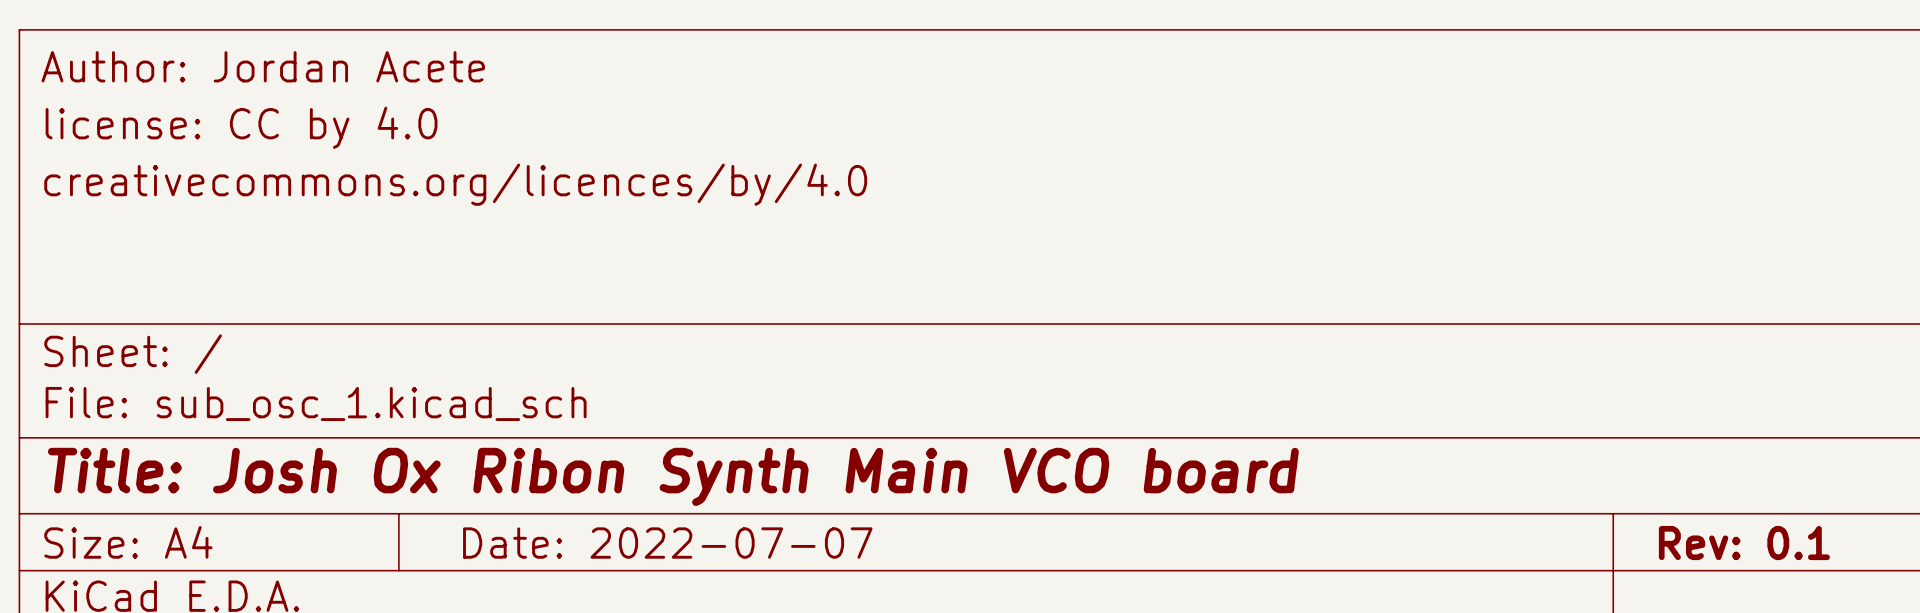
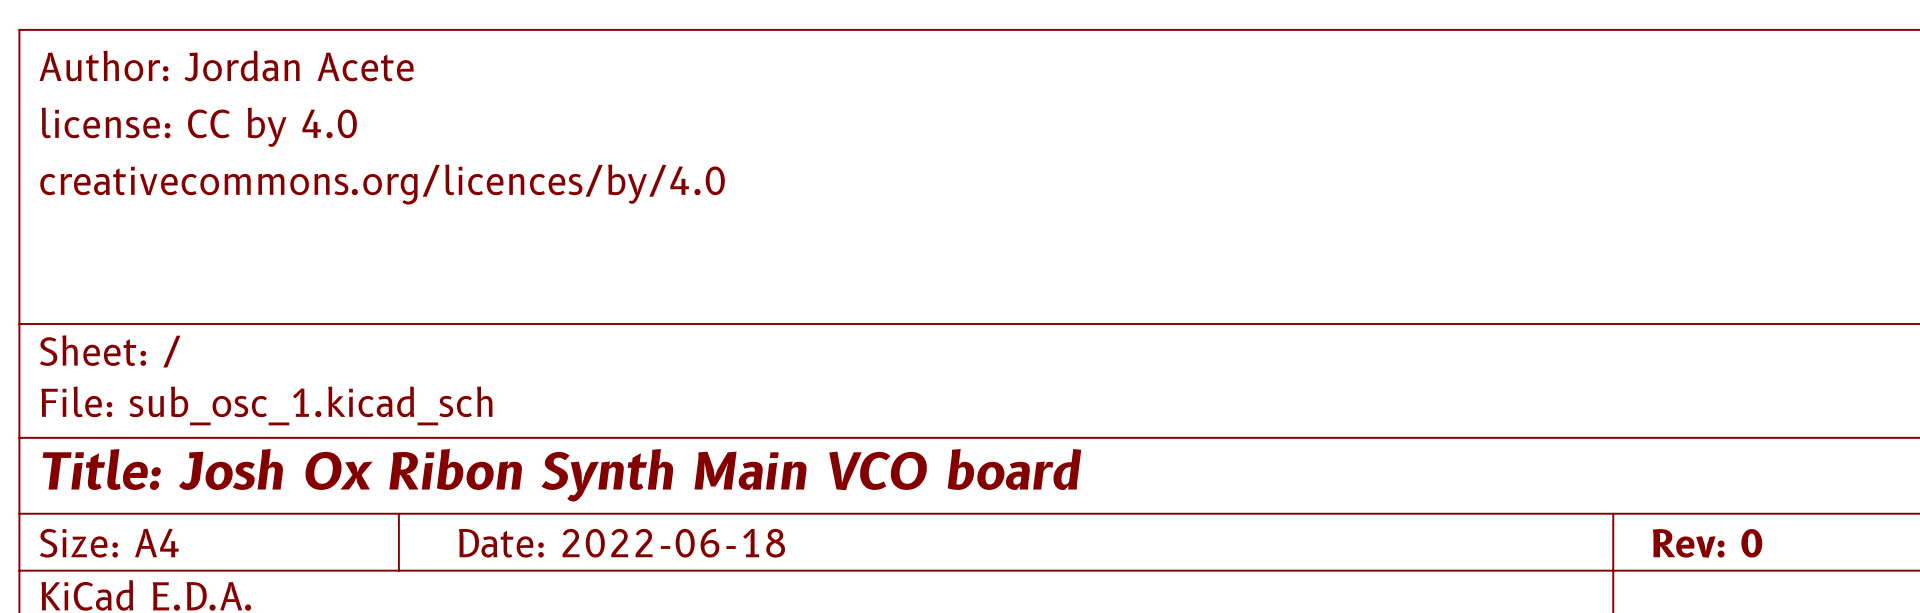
title block: Date: 2022-07-07 (667, 543) -> Date: 2022-06-18 (622, 543)
title block: Rev: 0.1 (1744, 543) -> Rev: 0 (1707, 543)

